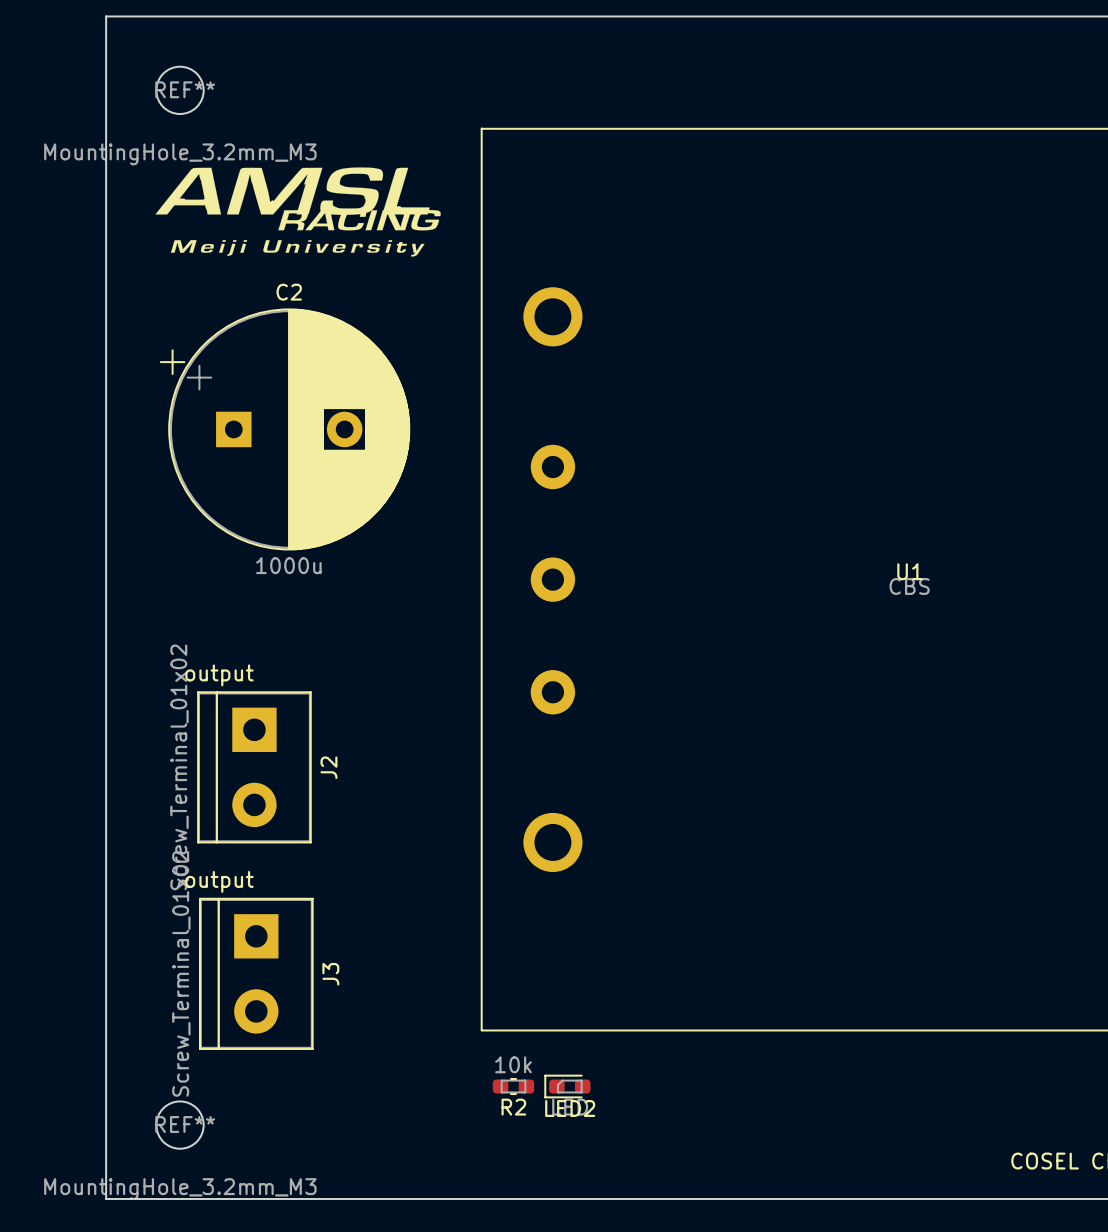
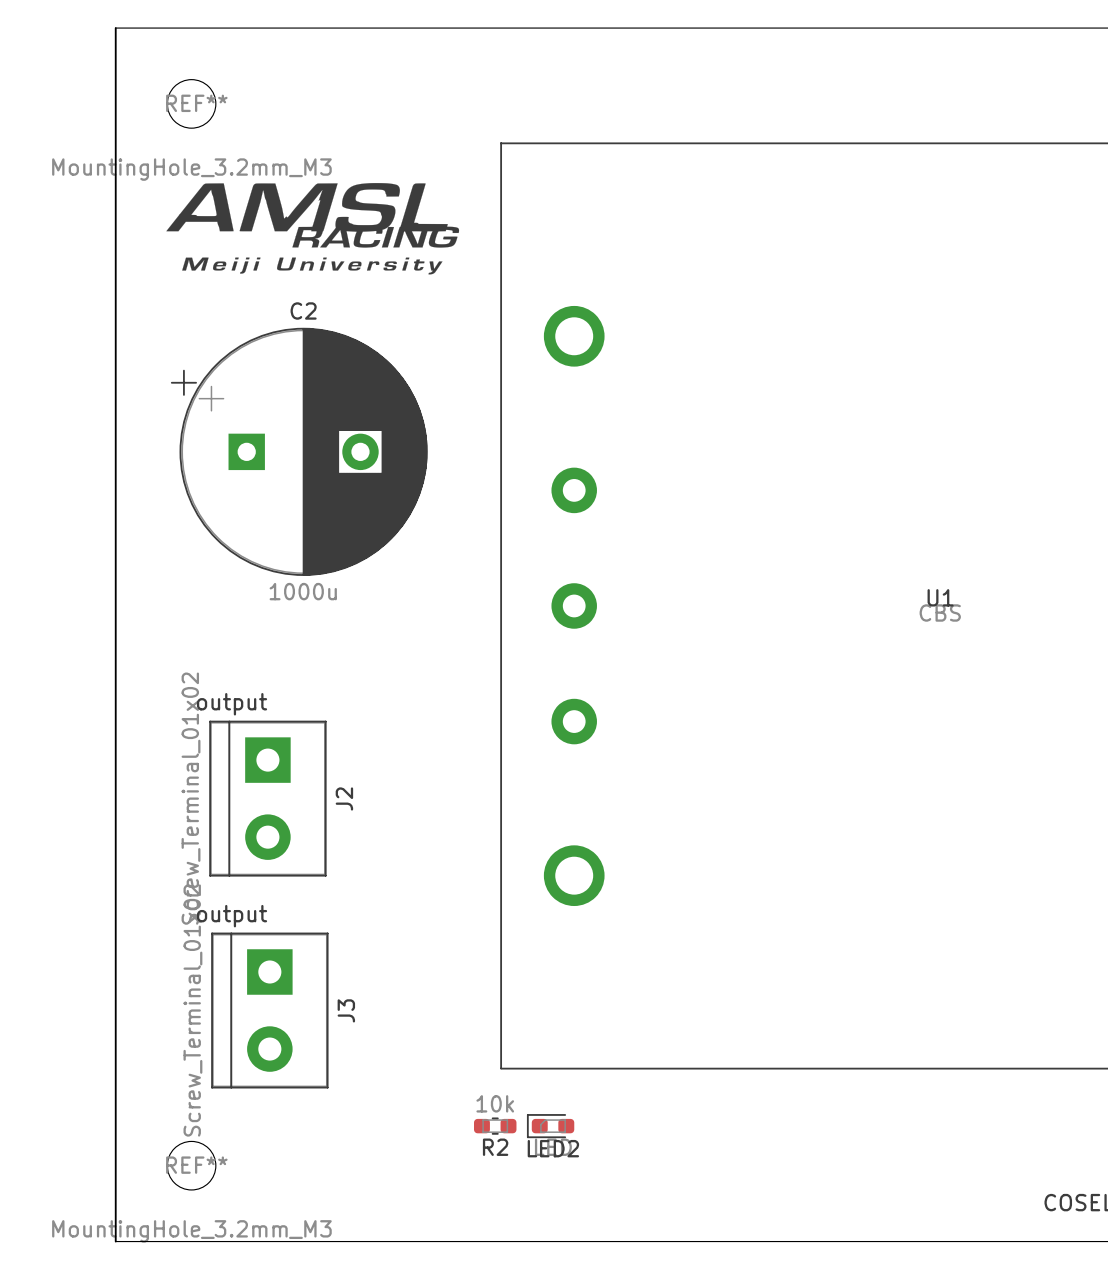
R2 position: (513, 1086) -> (495, 1126)
LED2 position: (567, 1086) -> (550, 1126)

